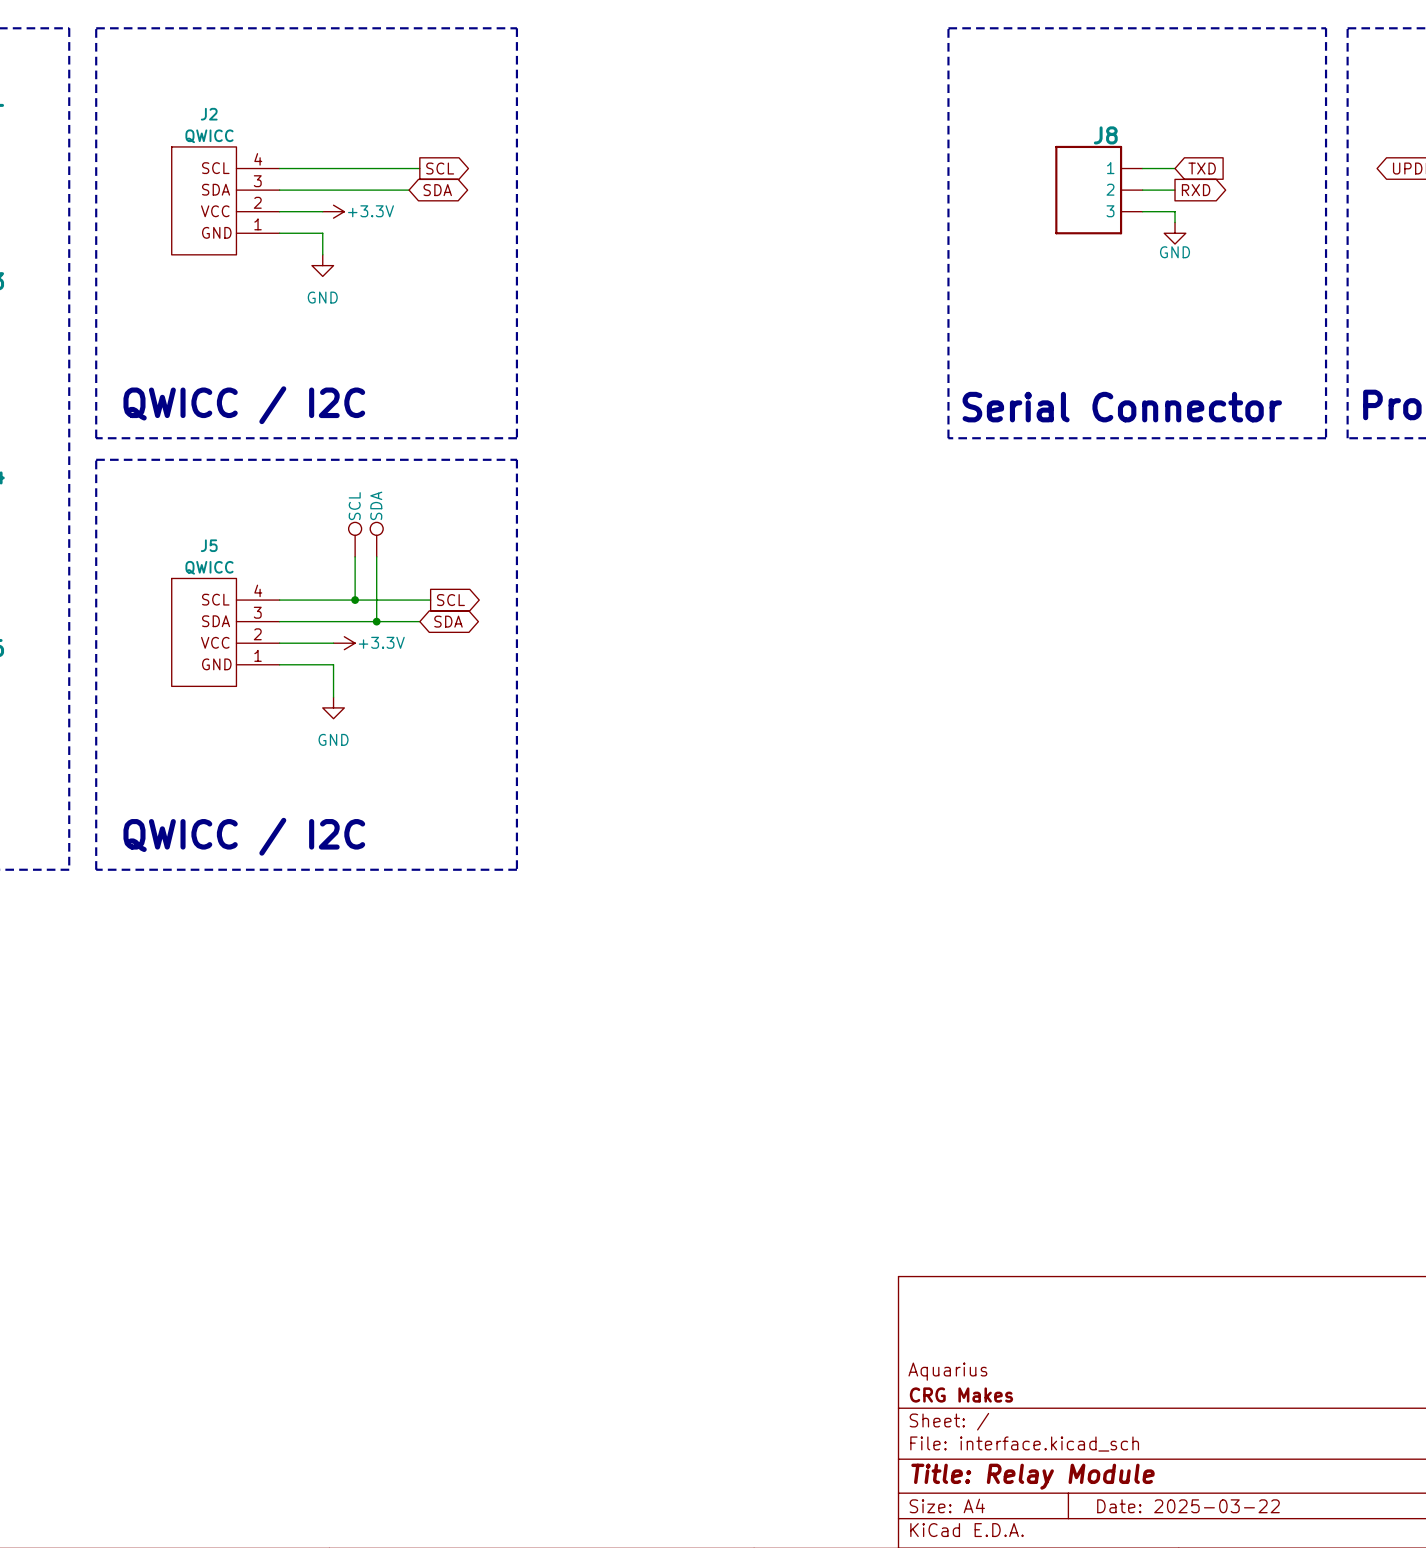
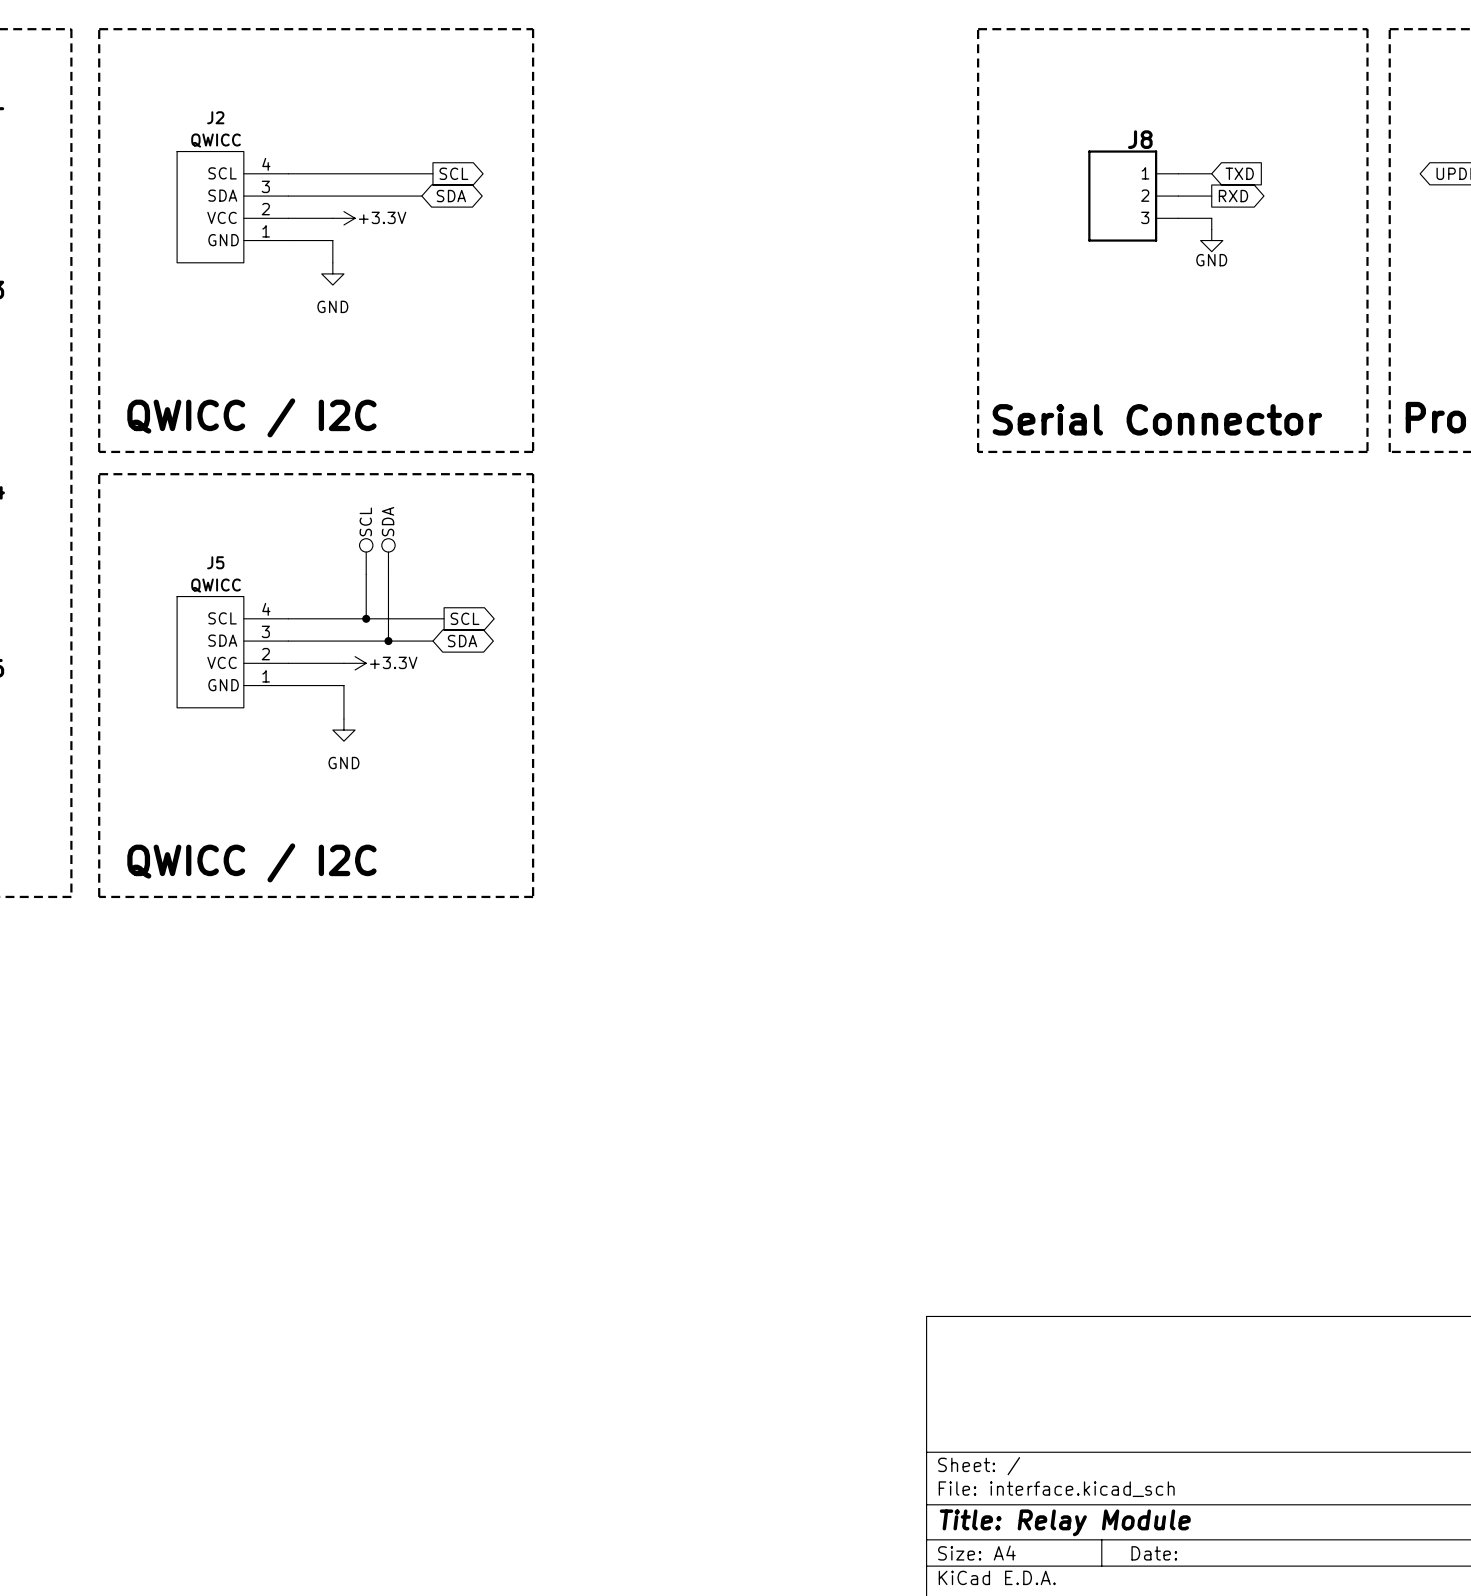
title block: Aquarius (947, 1371) -> none
title block: CRG Makes (961, 1395) -> none
title block: Date: 2025-03-22 (1188, 1506) -> Date: (1154, 1553)

